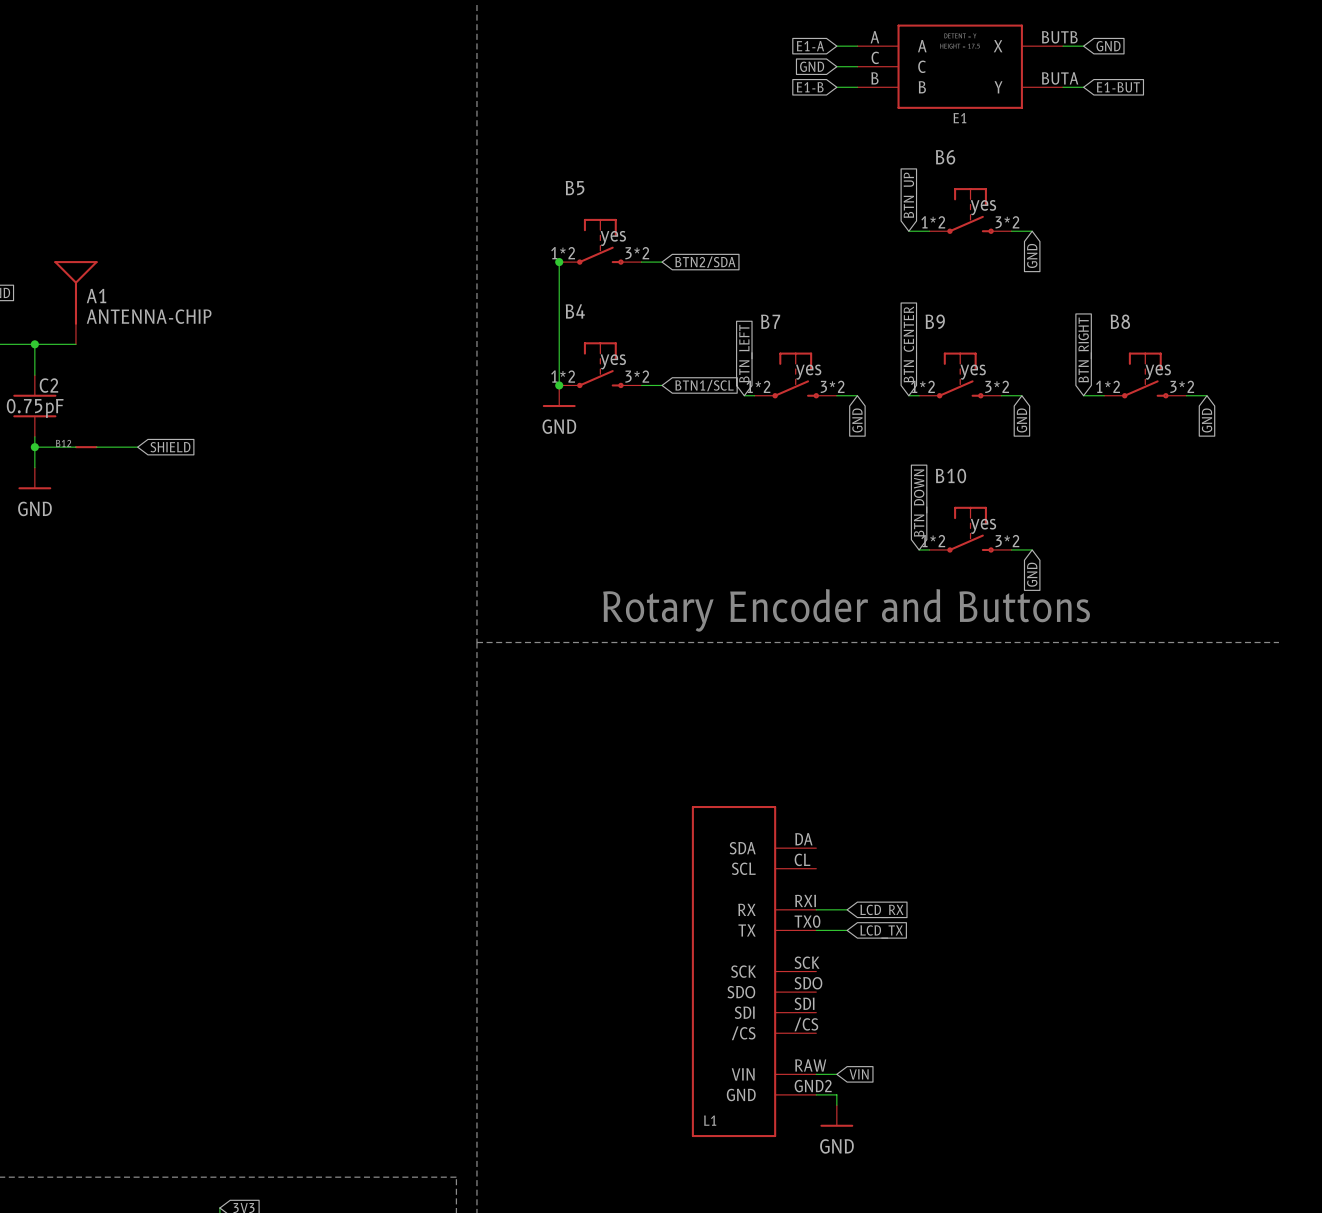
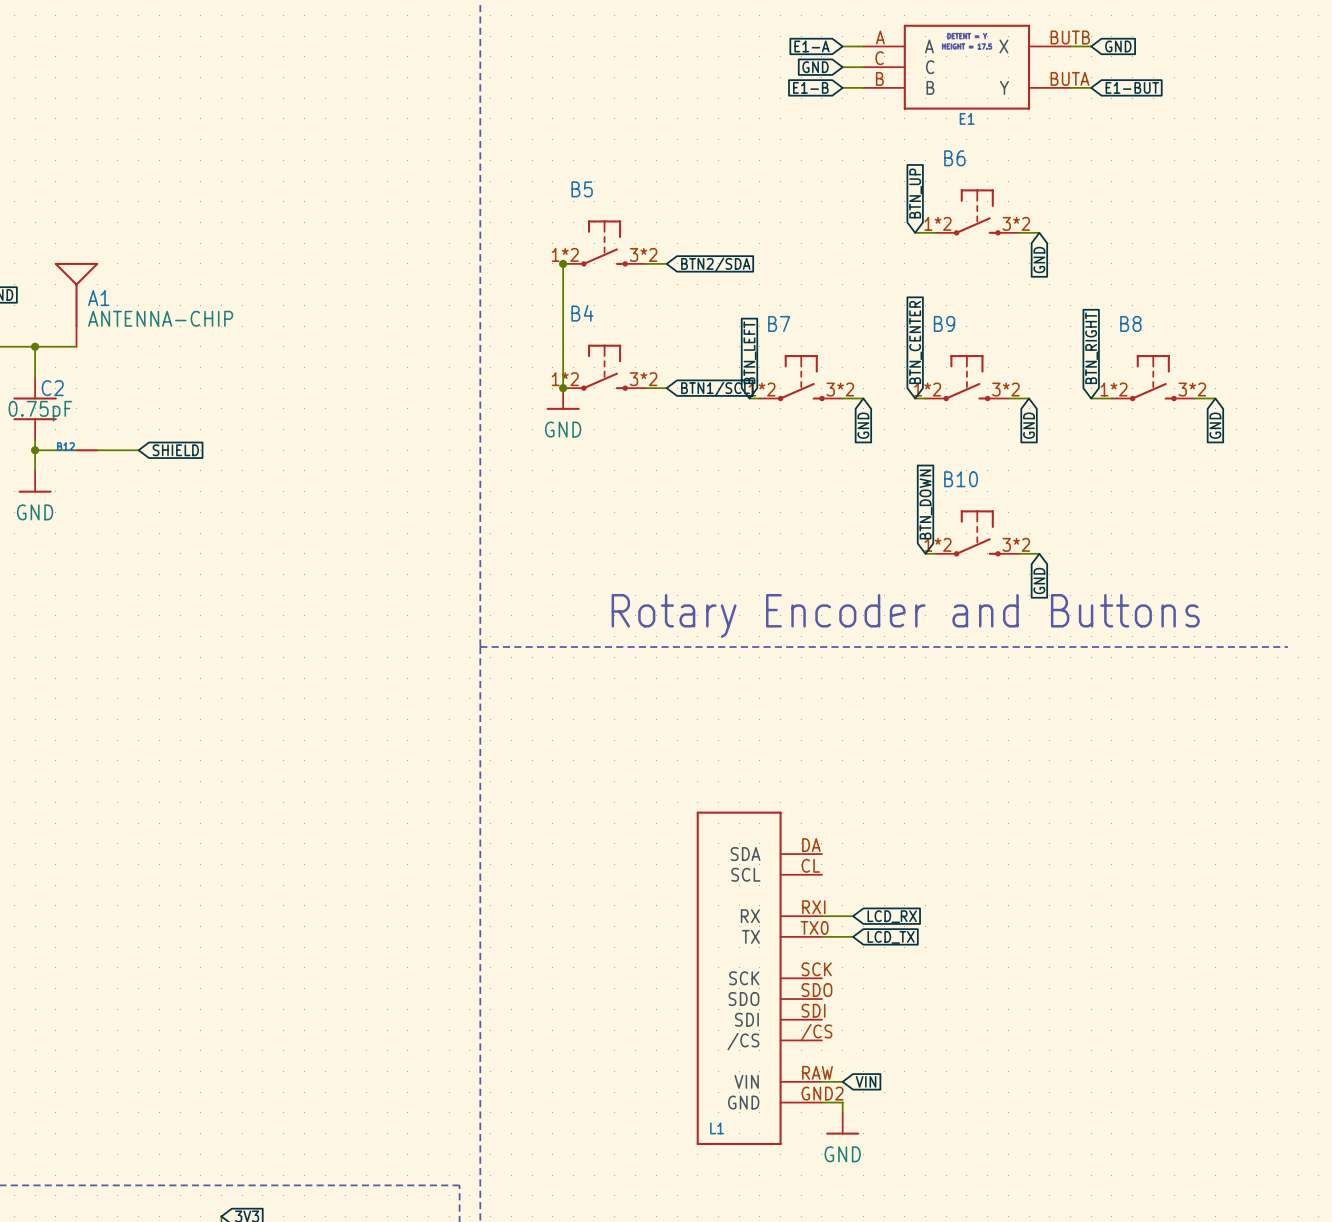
B6 text: yes (983, 207) -> none
B5 text: yes (613, 238) -> none
B4 text: yes (613, 361) -> none
B7 text: yes (808, 372) -> none
B9 text: yes (973, 372) -> none
B8 text: yes (1158, 372) -> none
B10 text: yes (983, 526) -> none

